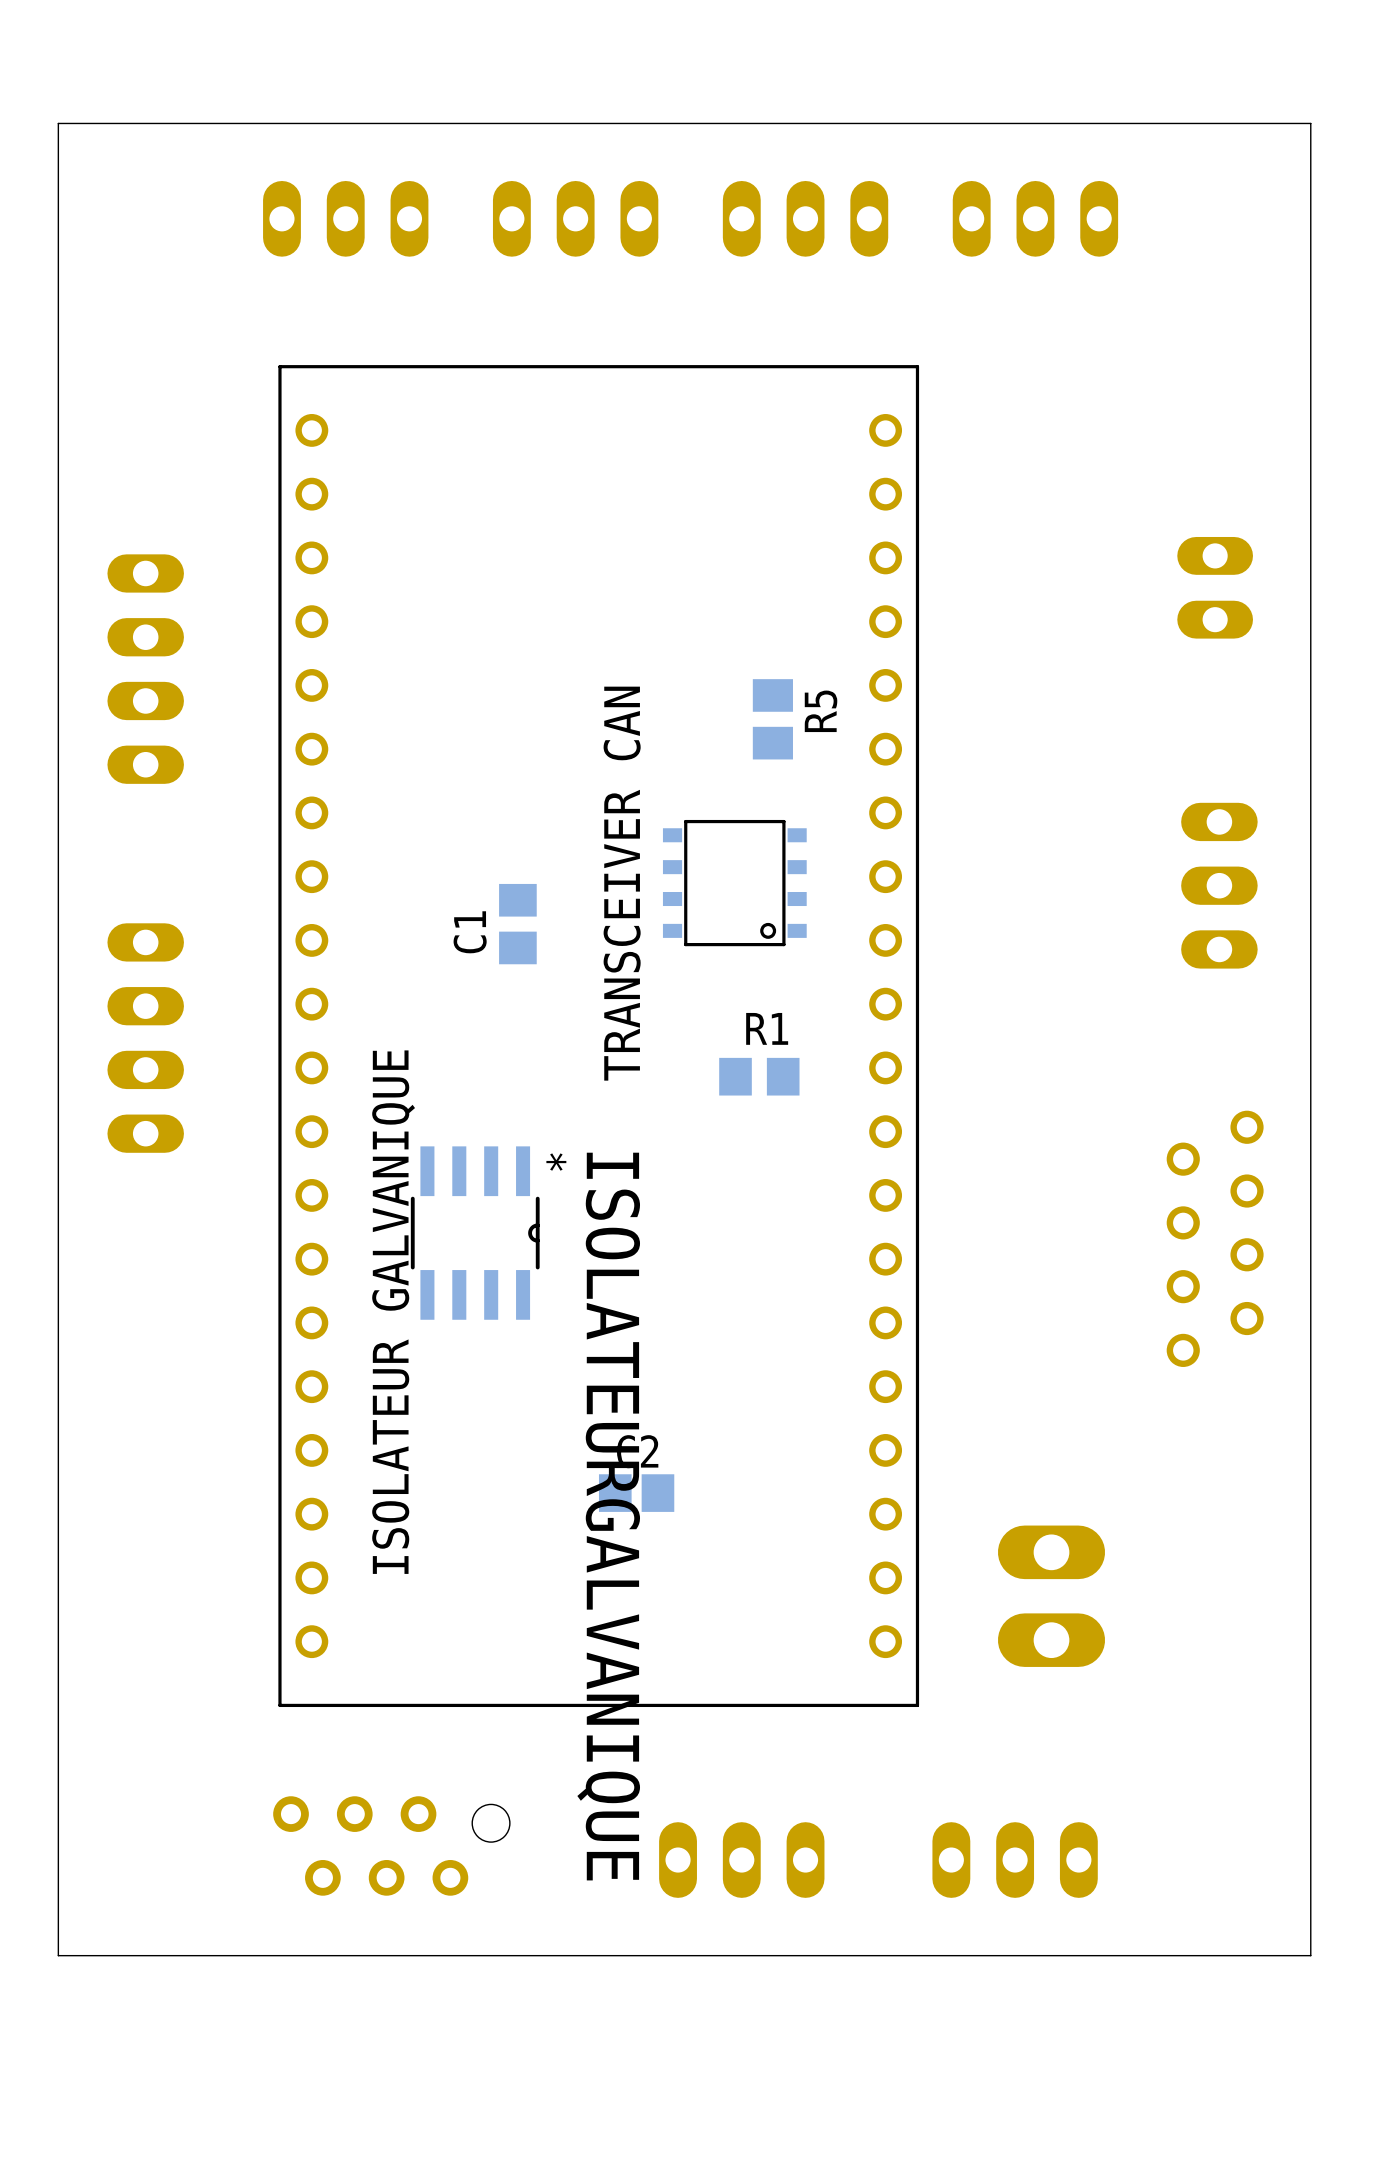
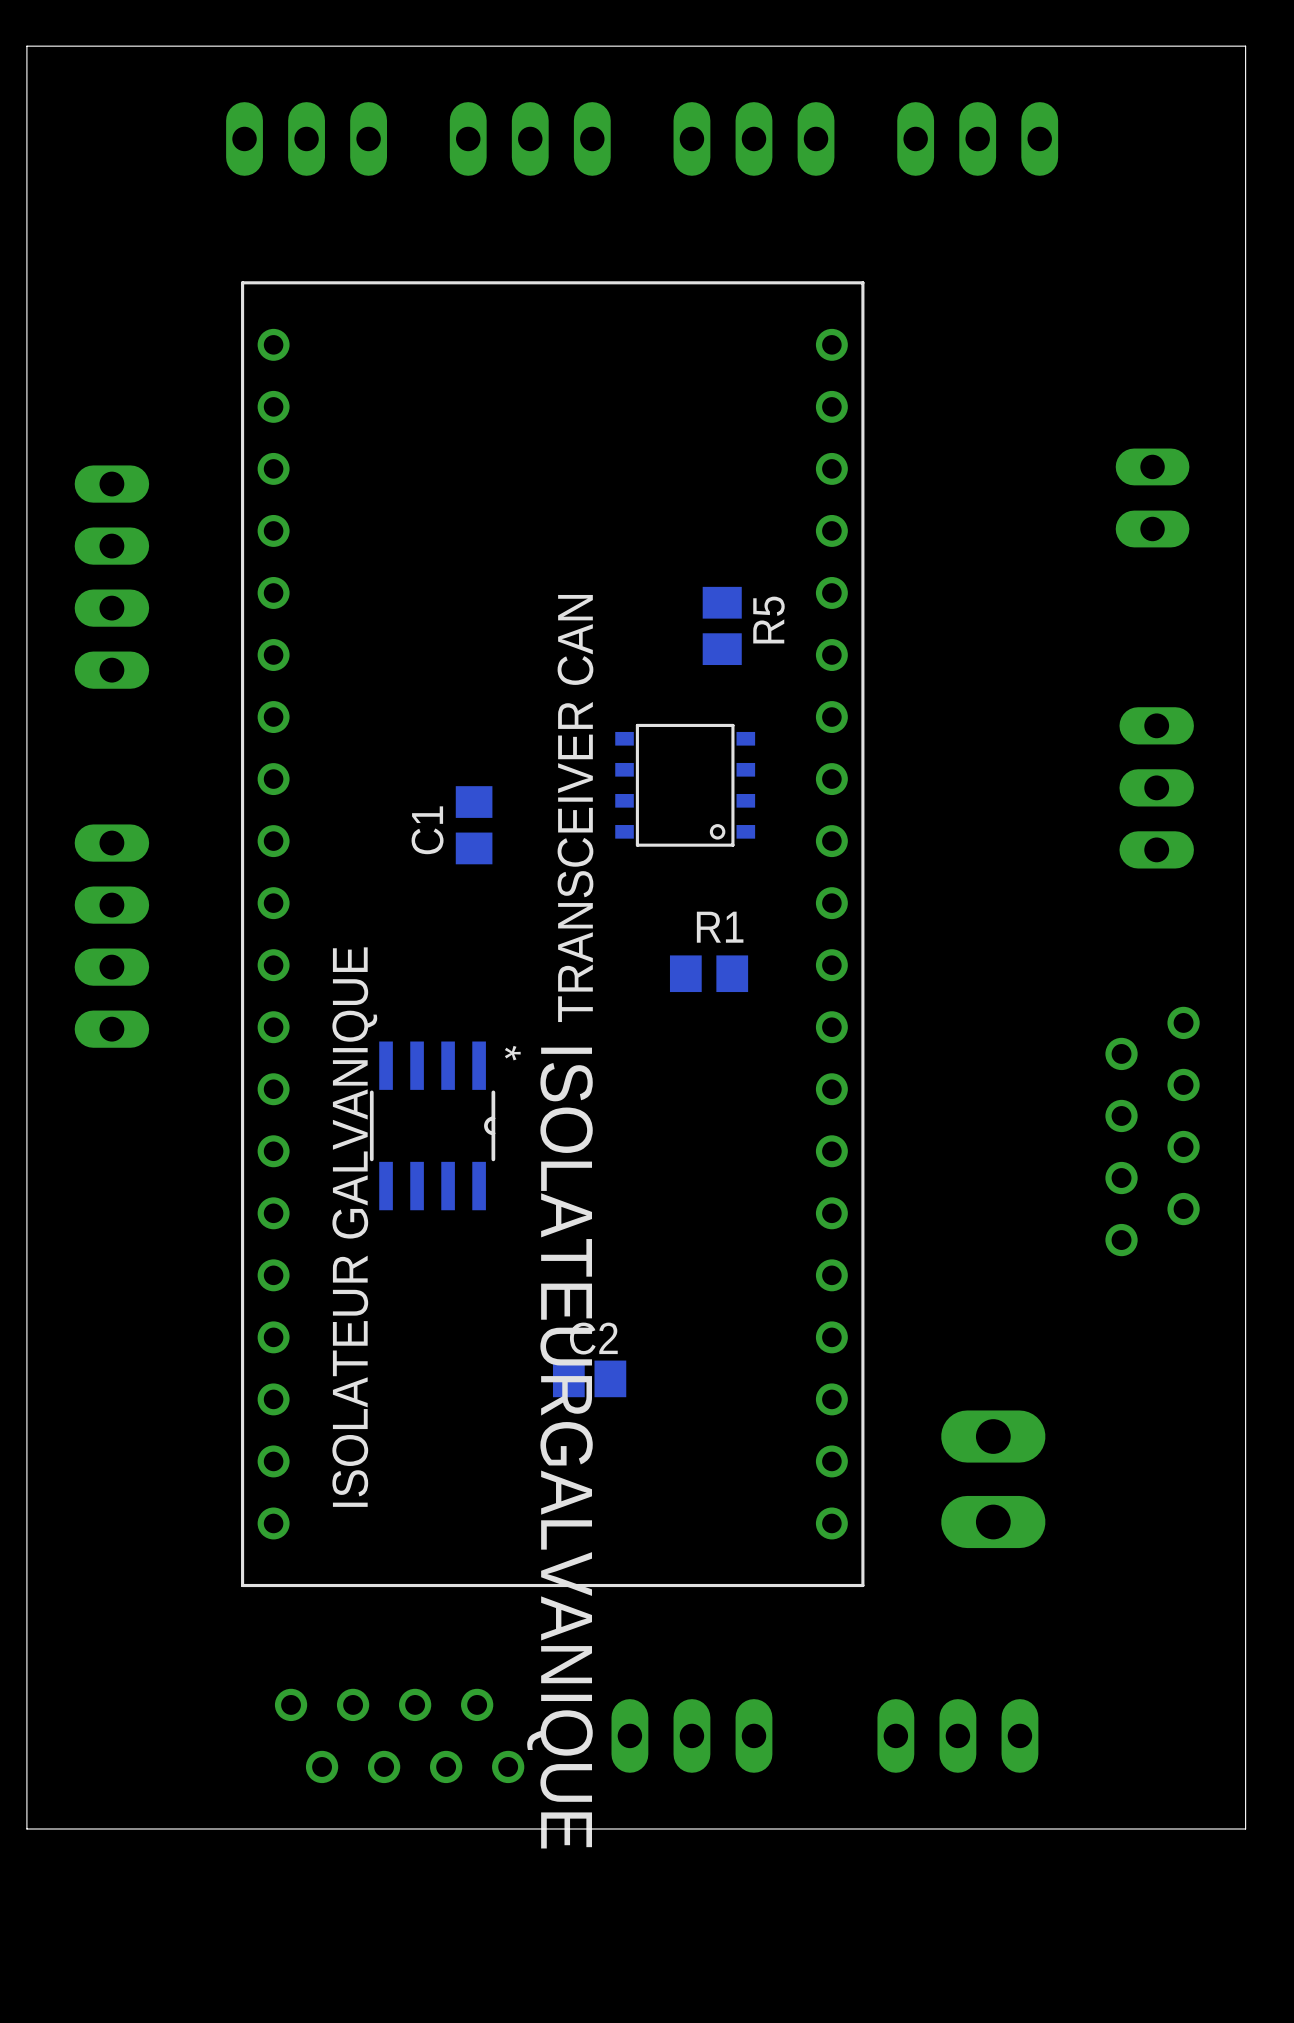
part: (391, 1845) -> none
part: none -> (399, 1735)

